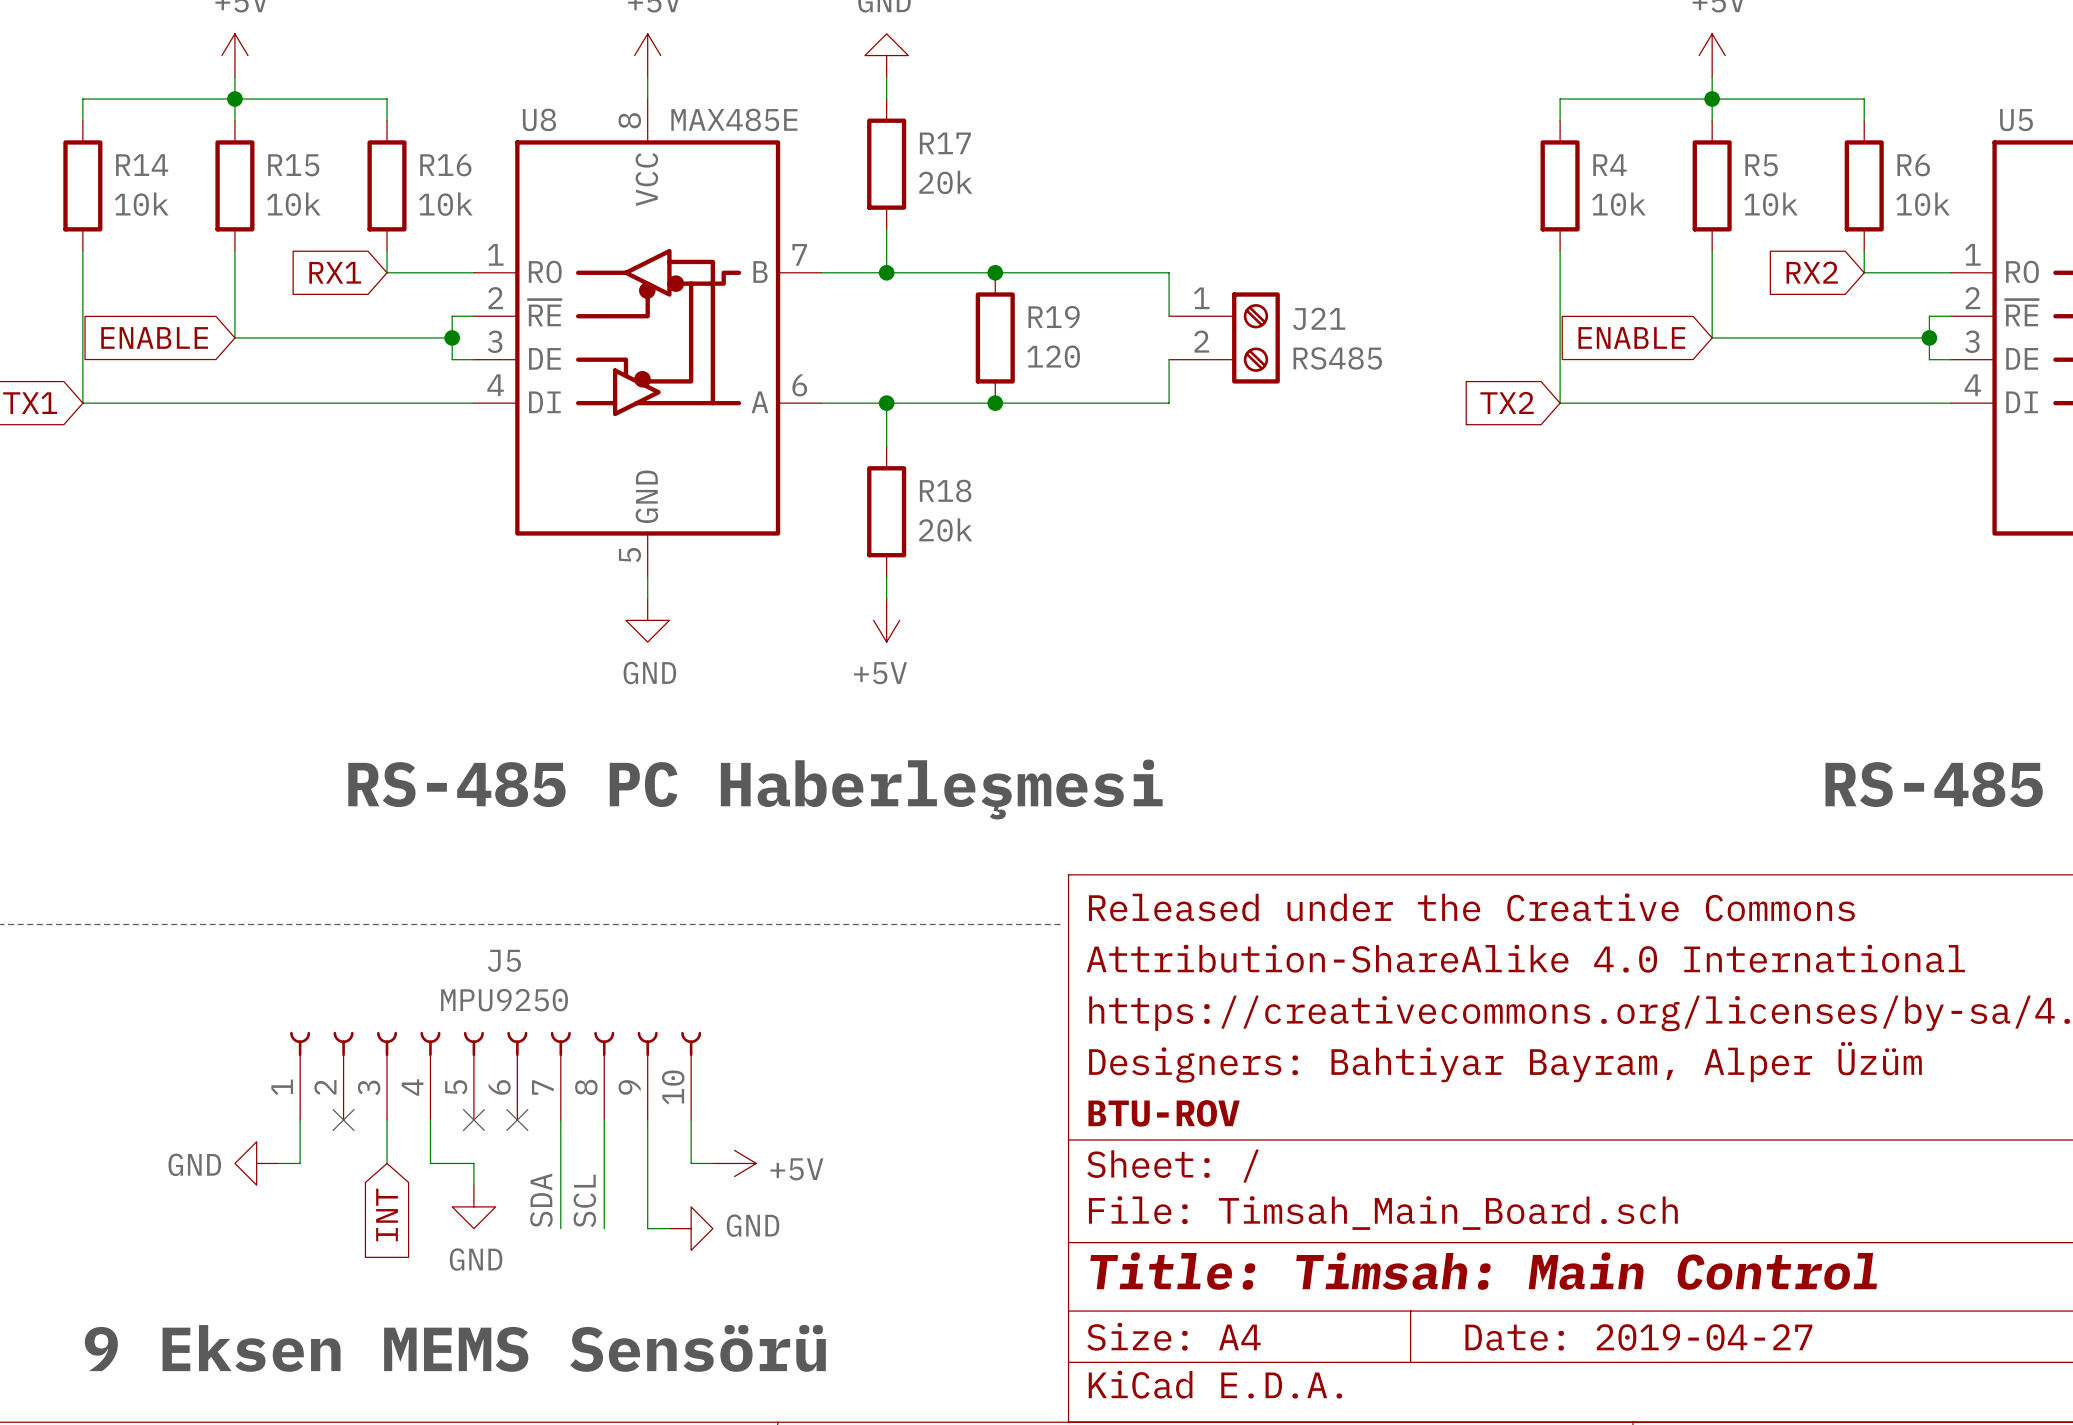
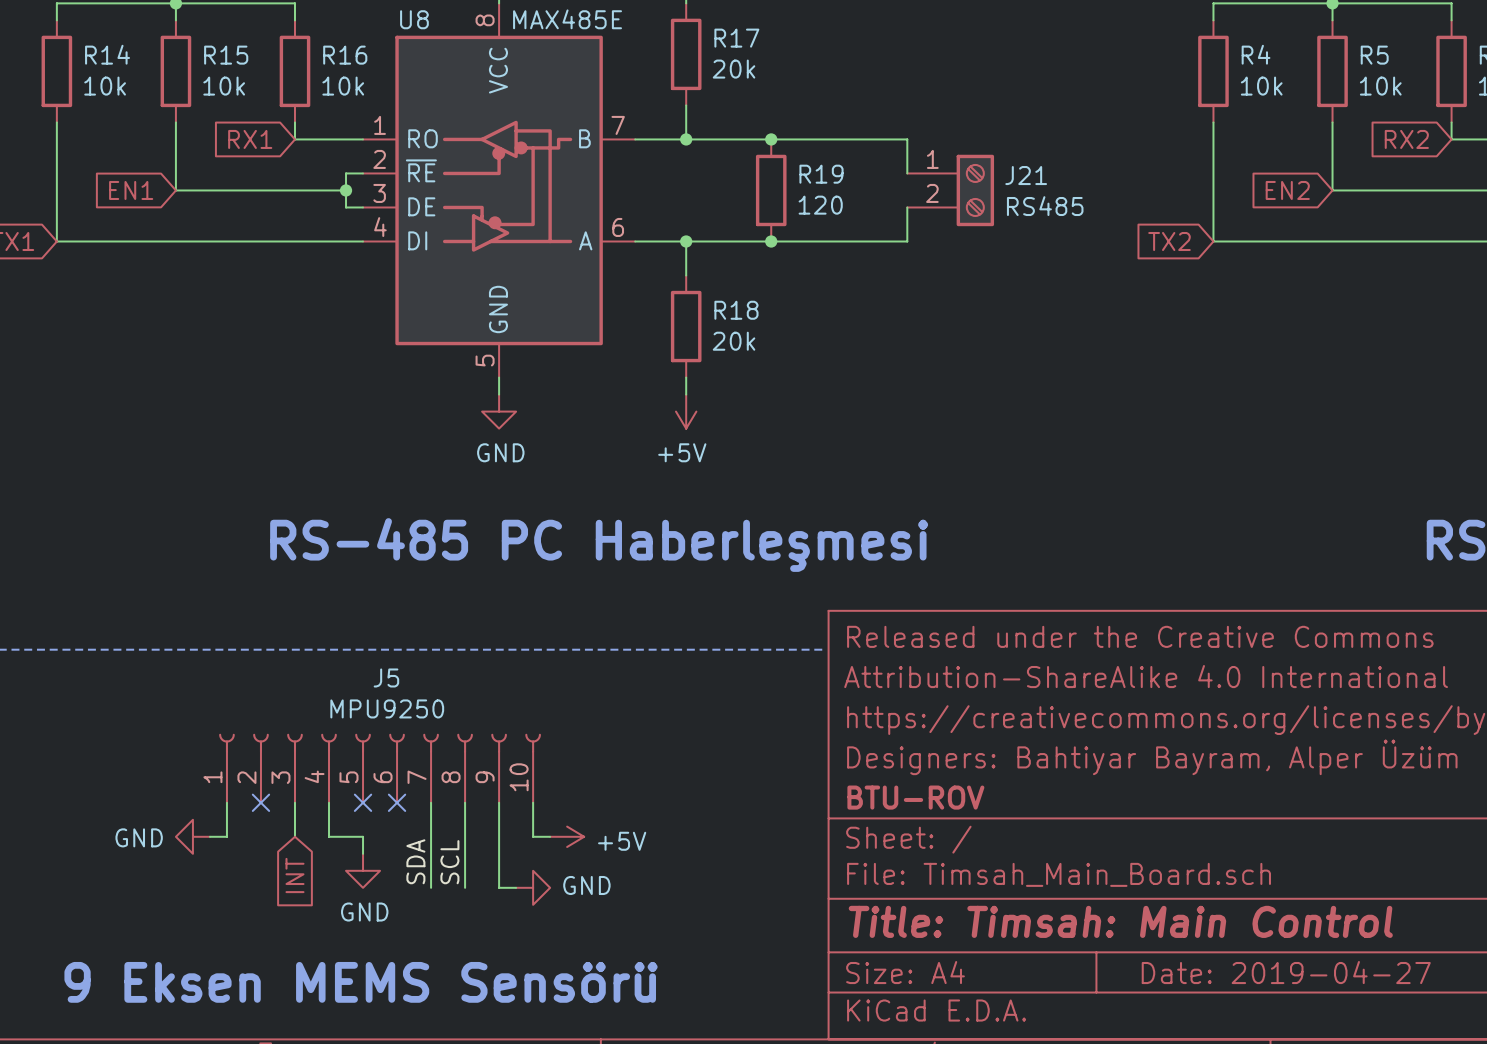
global label: ENABLE (154, 337) -> EN1 (131, 190)
global label: ENABLE (1631, 337) -> EN2 (1287, 190)

